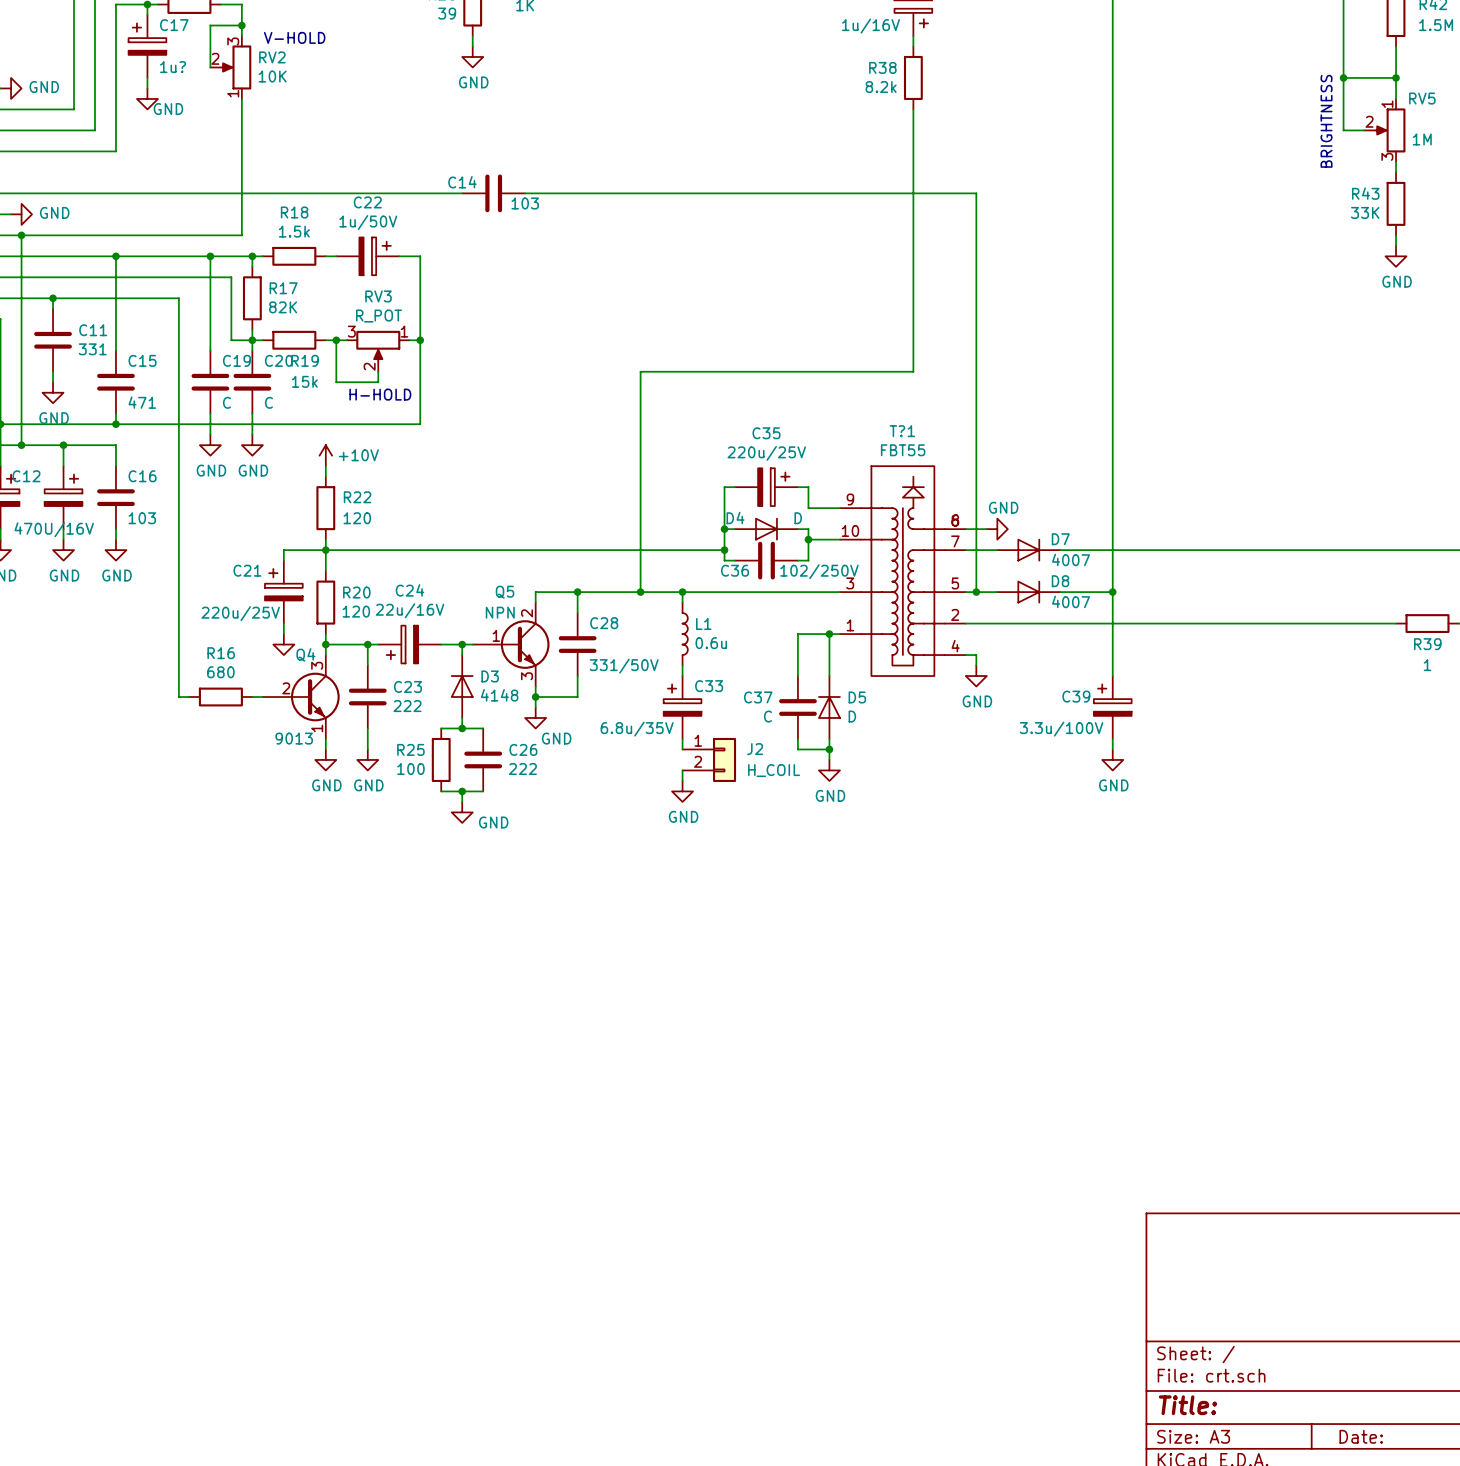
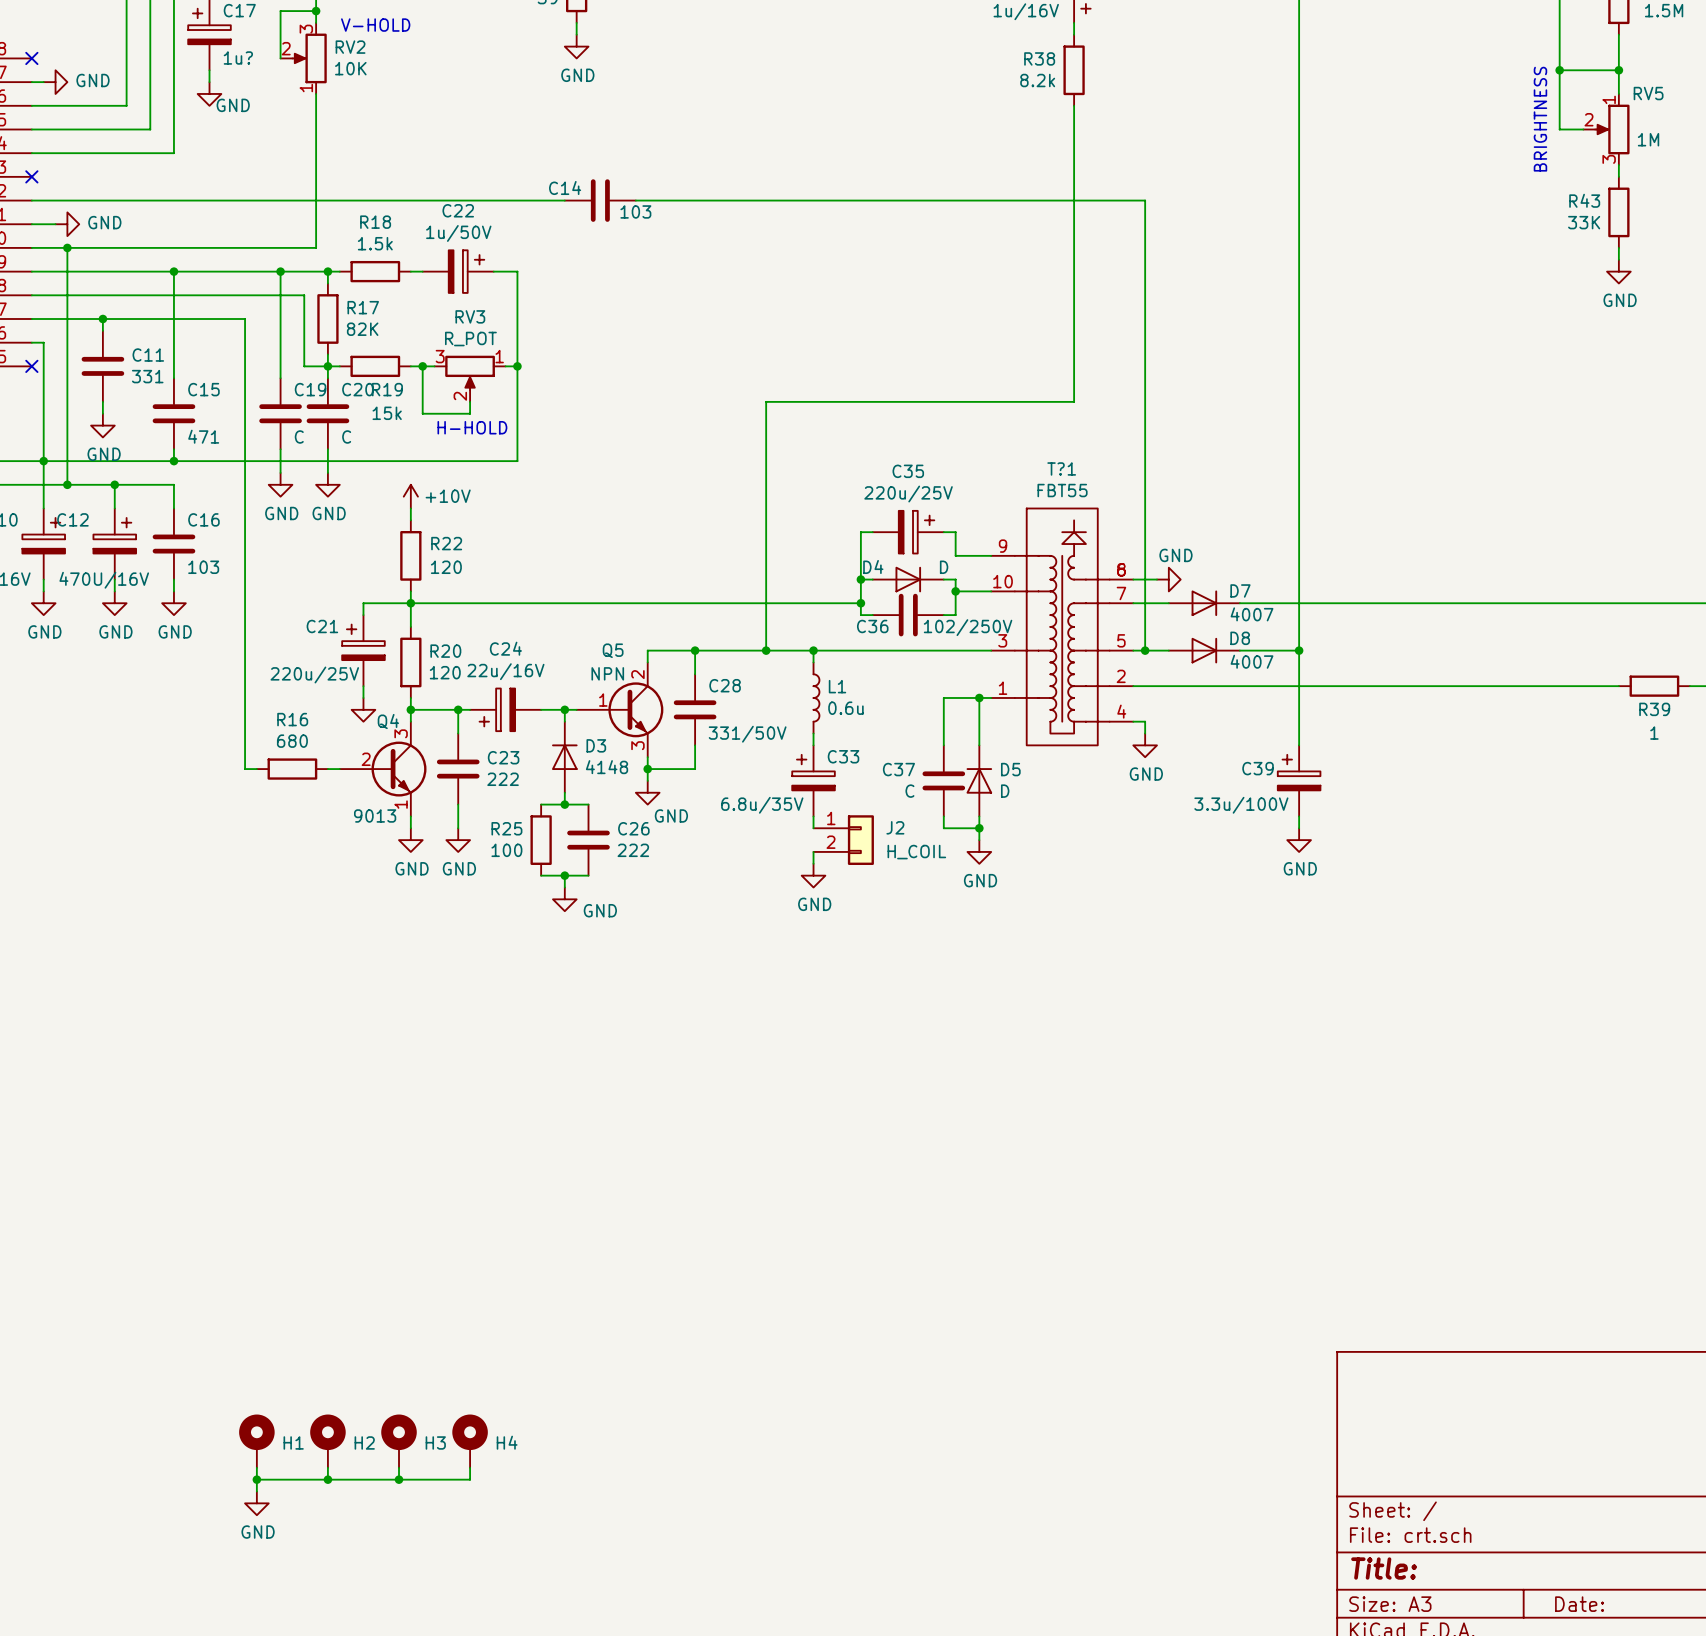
H1: none -> (256, 1441)
H2: none -> (327, 1441)
H3: none -> (399, 1441)
H4: none -> (470, 1441)
wire: none -> (256, 1467) (256, 1491)
wire: none -> (327, 1467) (327, 1479)
wire: none -> (399, 1467) (399, 1479)
wire: none -> (470, 1467) (470, 1479) (256, 1479)
junction: none -> (256, 1479)
junction: none -> (327, 1479)
junction: none -> (399, 1479)
power symbol: none -> GND (256, 1503)

